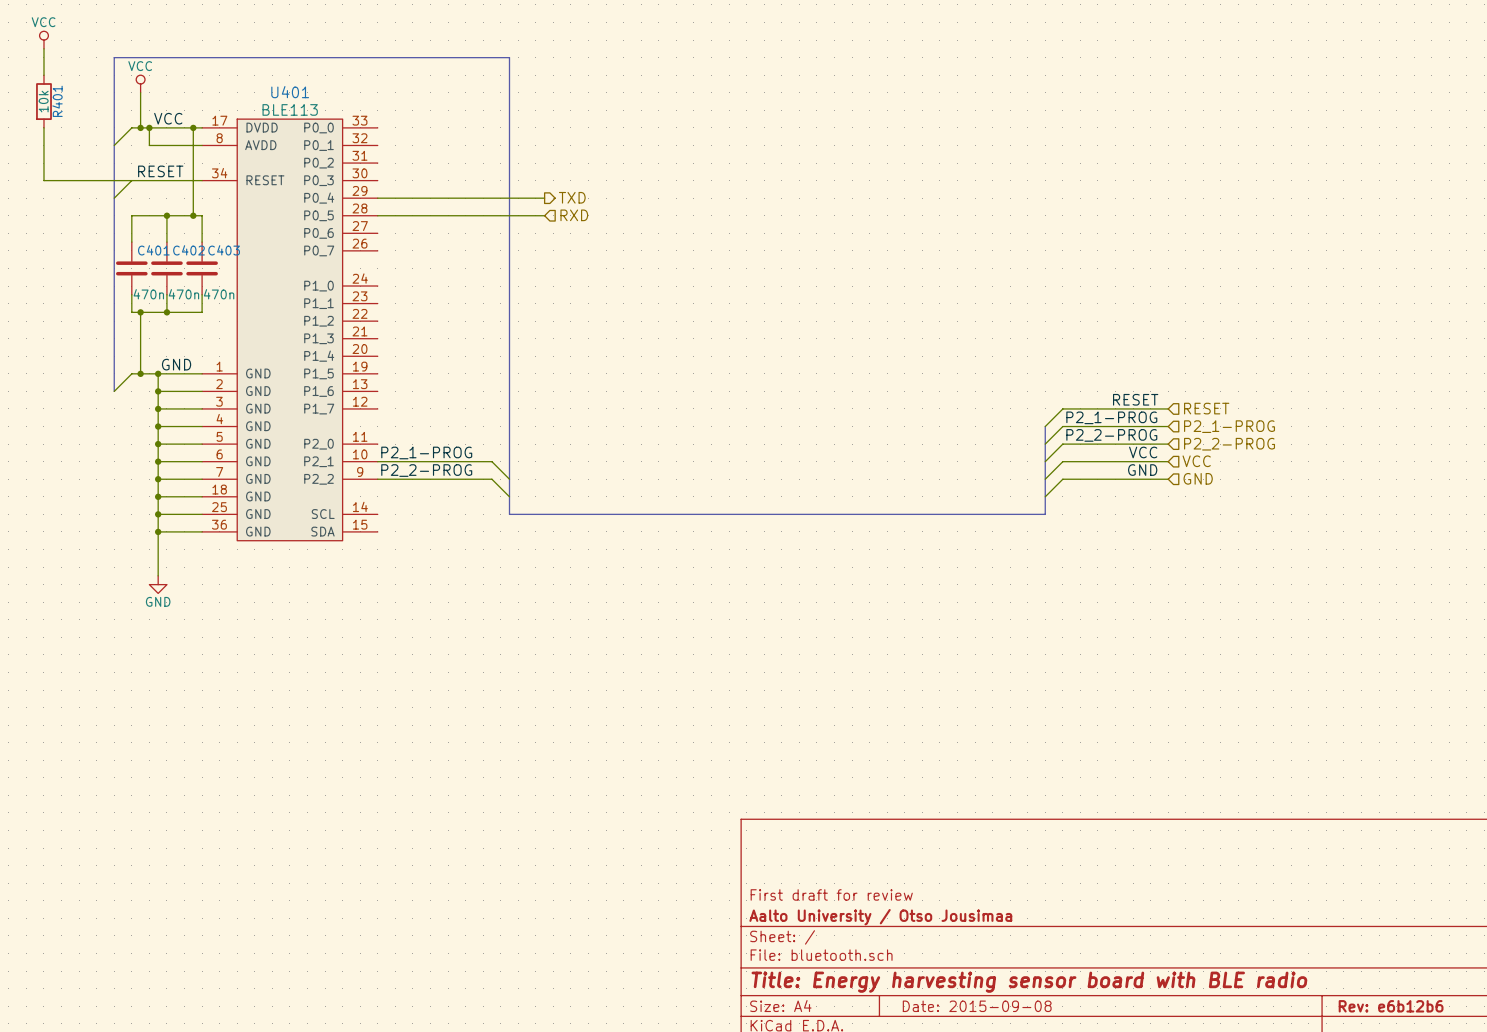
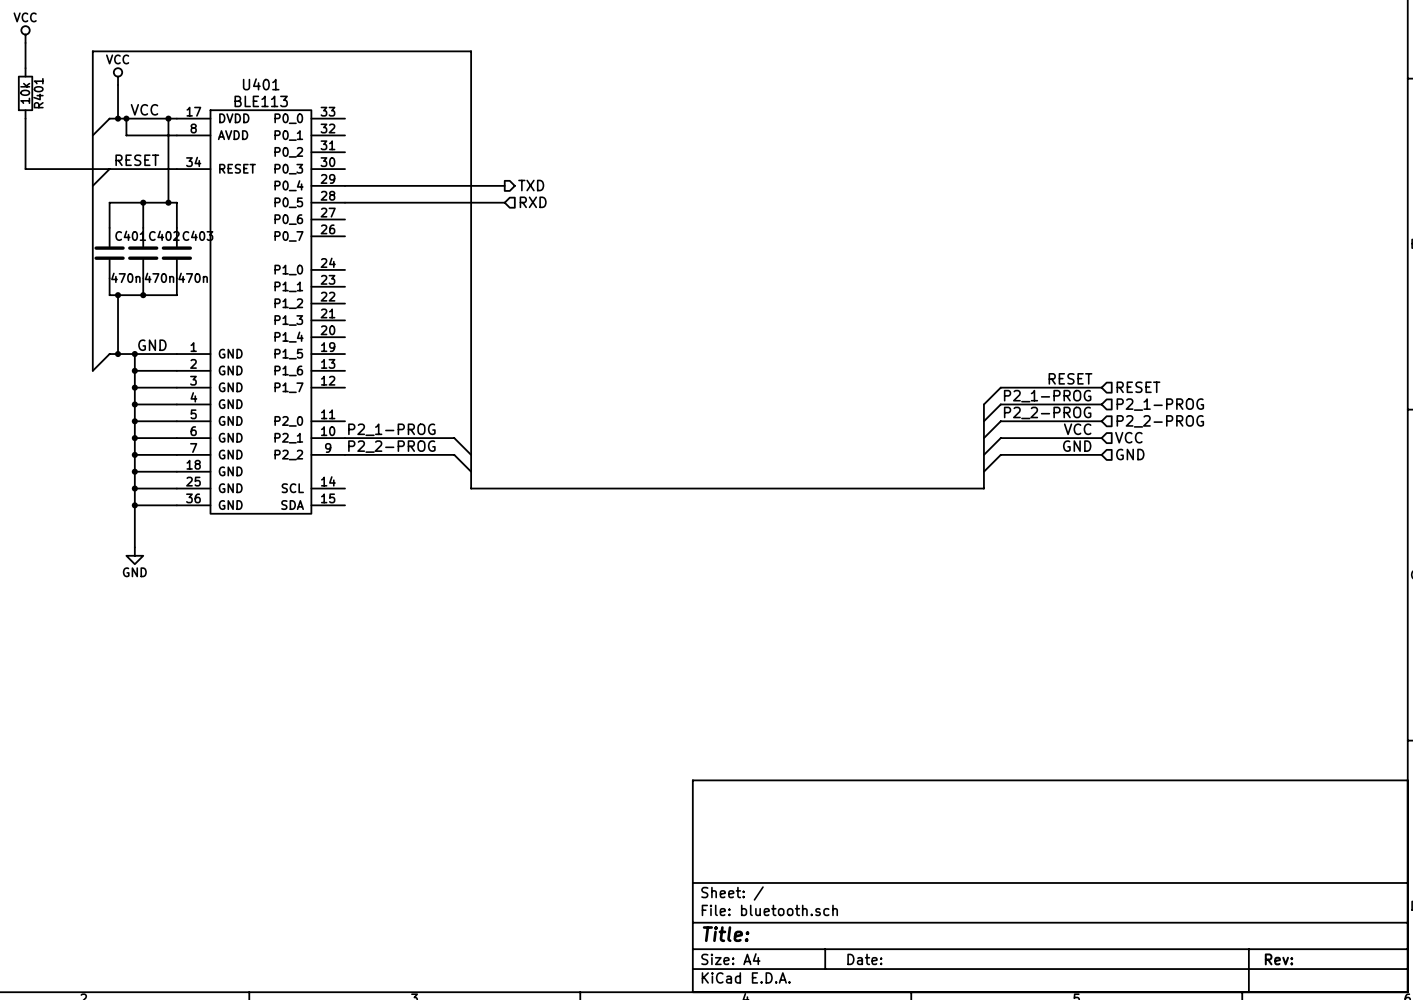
title block: First draft for review (831, 894) -> none
title block: Aalto University / Otso Jousimaa (880, 917) -> none
title block: Title: Energy harvesting sensor board with BLE radio (1029, 982) -> Title: (726, 934)
title block: Date: 2015-09-08 (977, 1006) -> Date: (864, 959)
title block: Rev: e6b12b6 (1391, 1006) -> Rev: (1279, 959)

